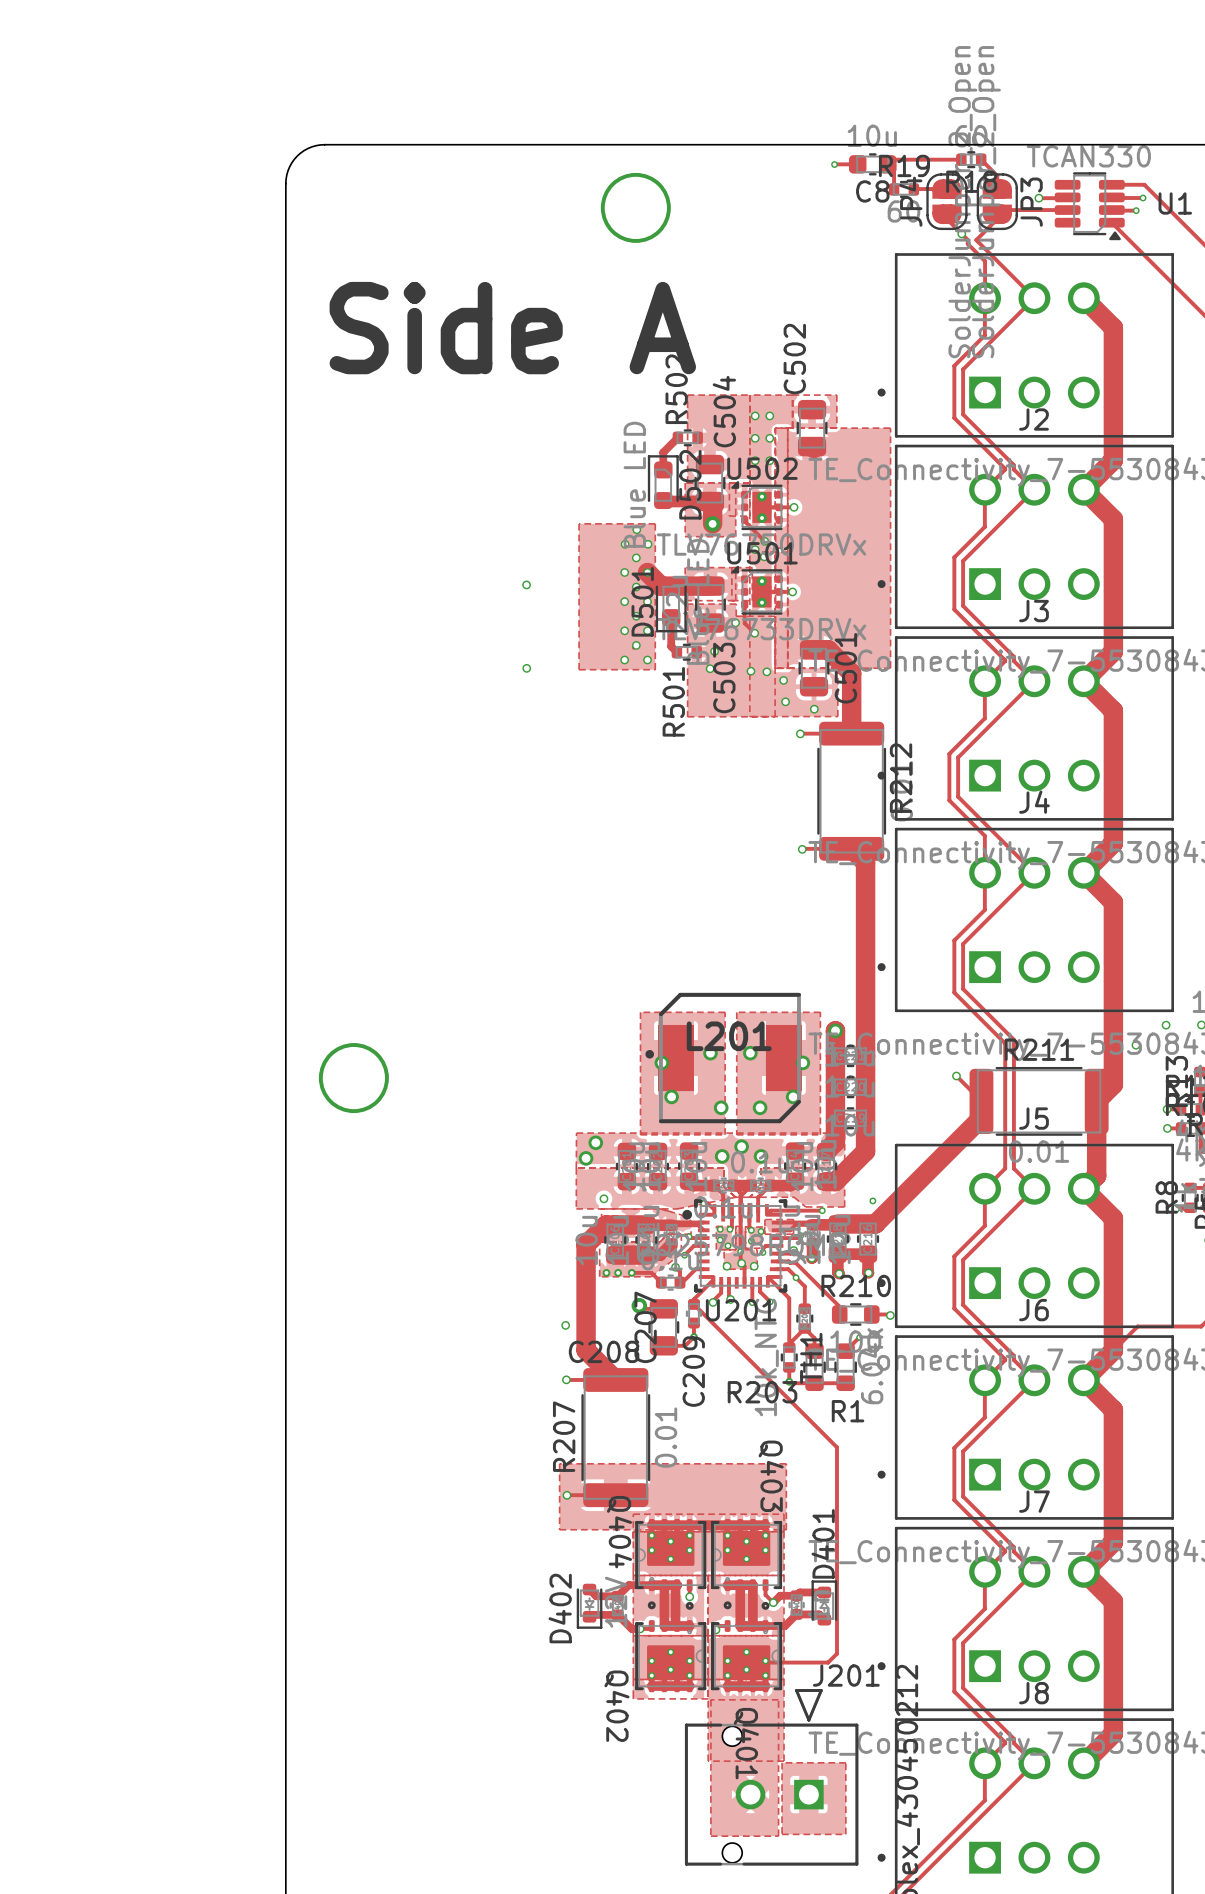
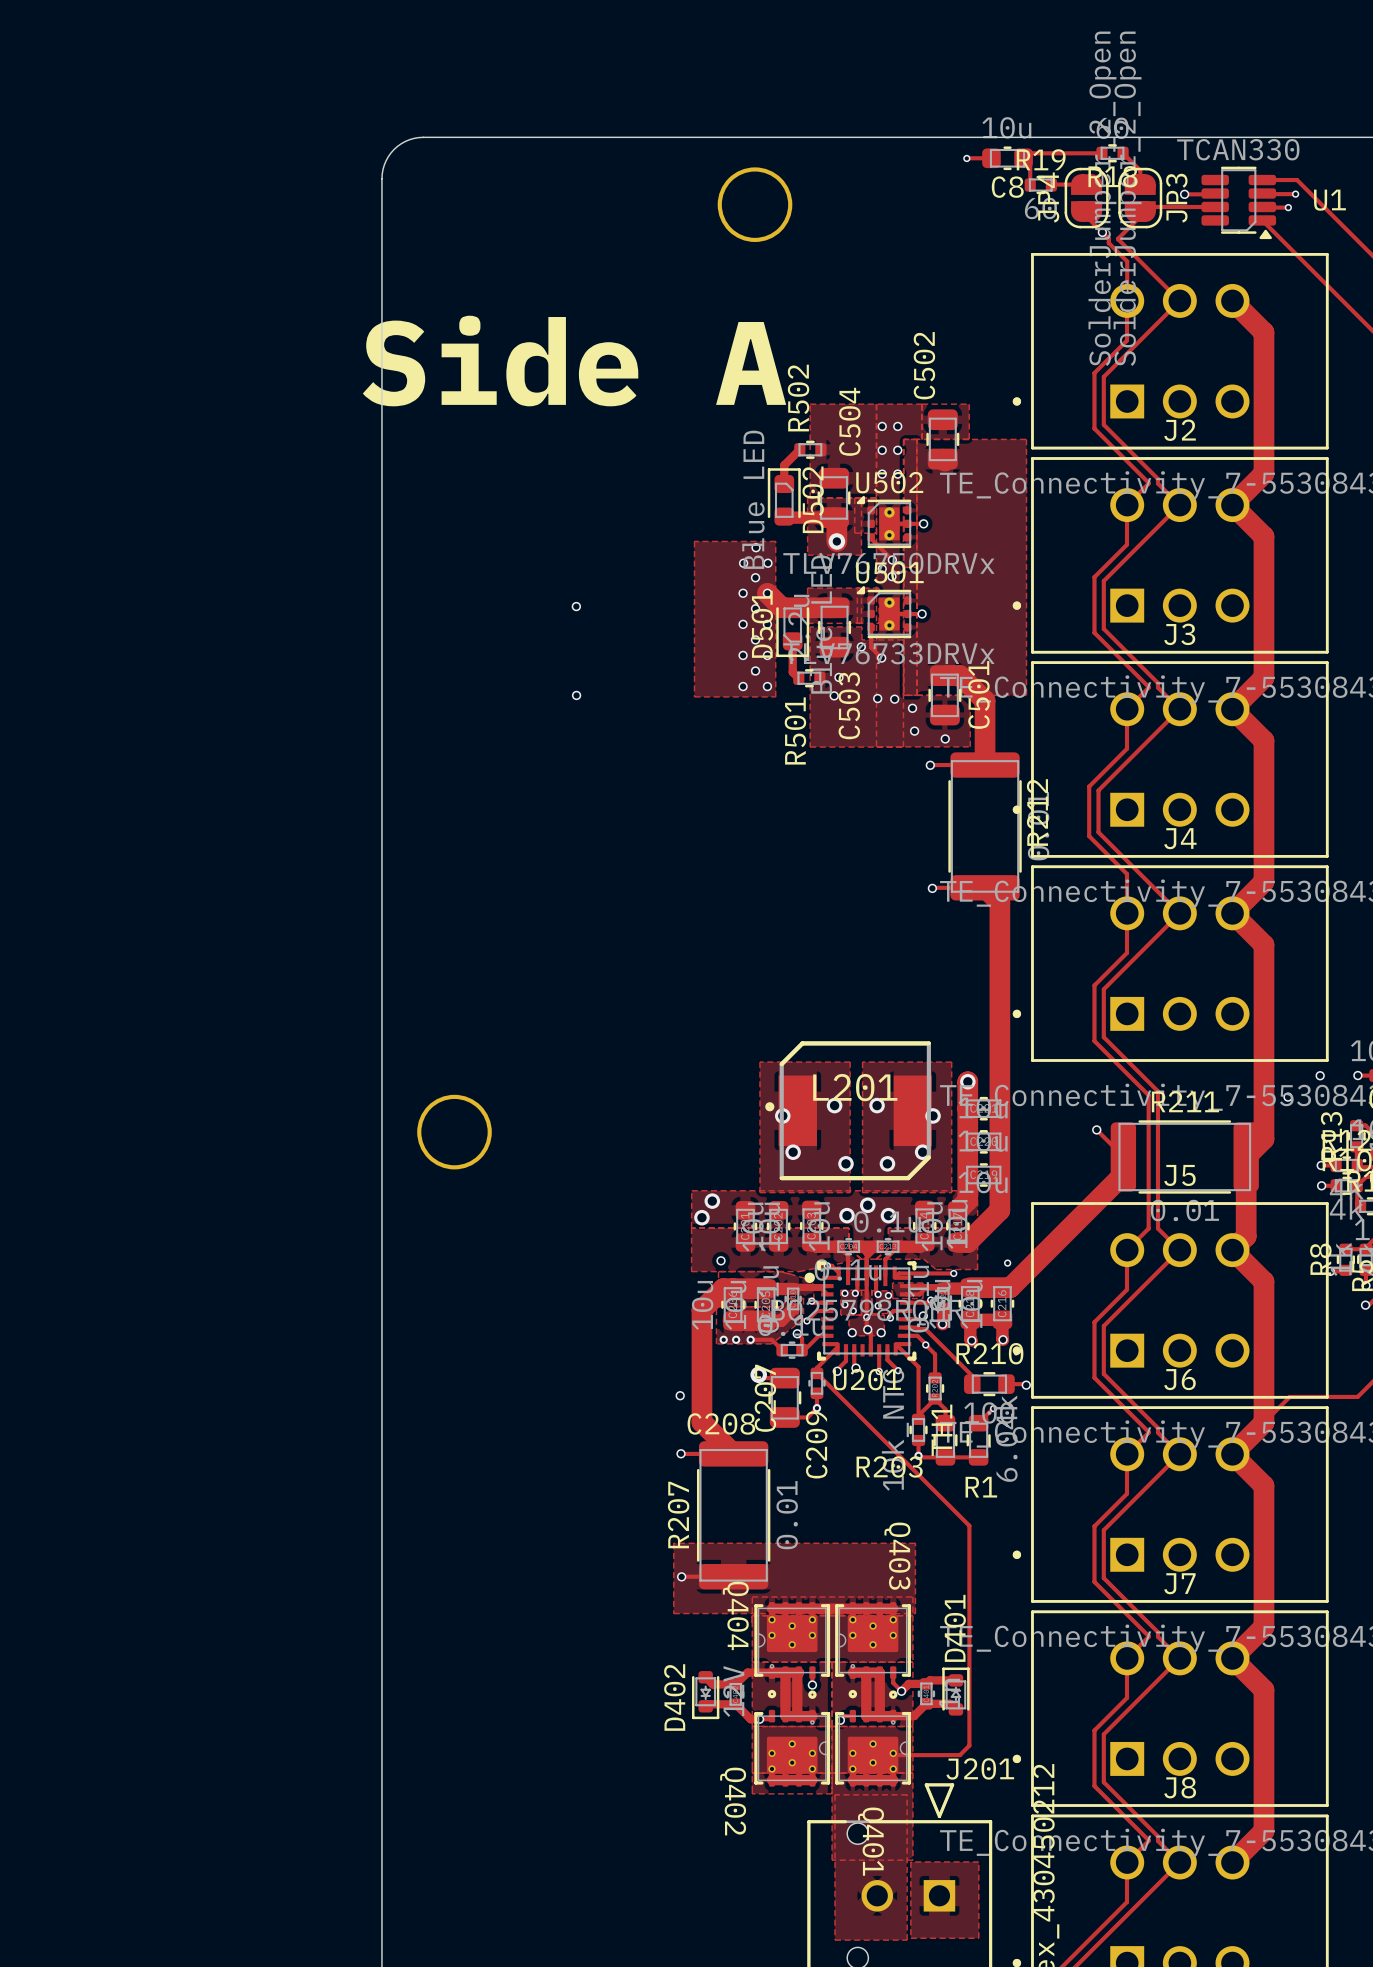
text position: Side A (512, 328) -> Side A (574, 361)
via: none -> (576, 606)
via: (526, 584) -> none
via: none -> (576, 695)
via: (526, 668) -> none

